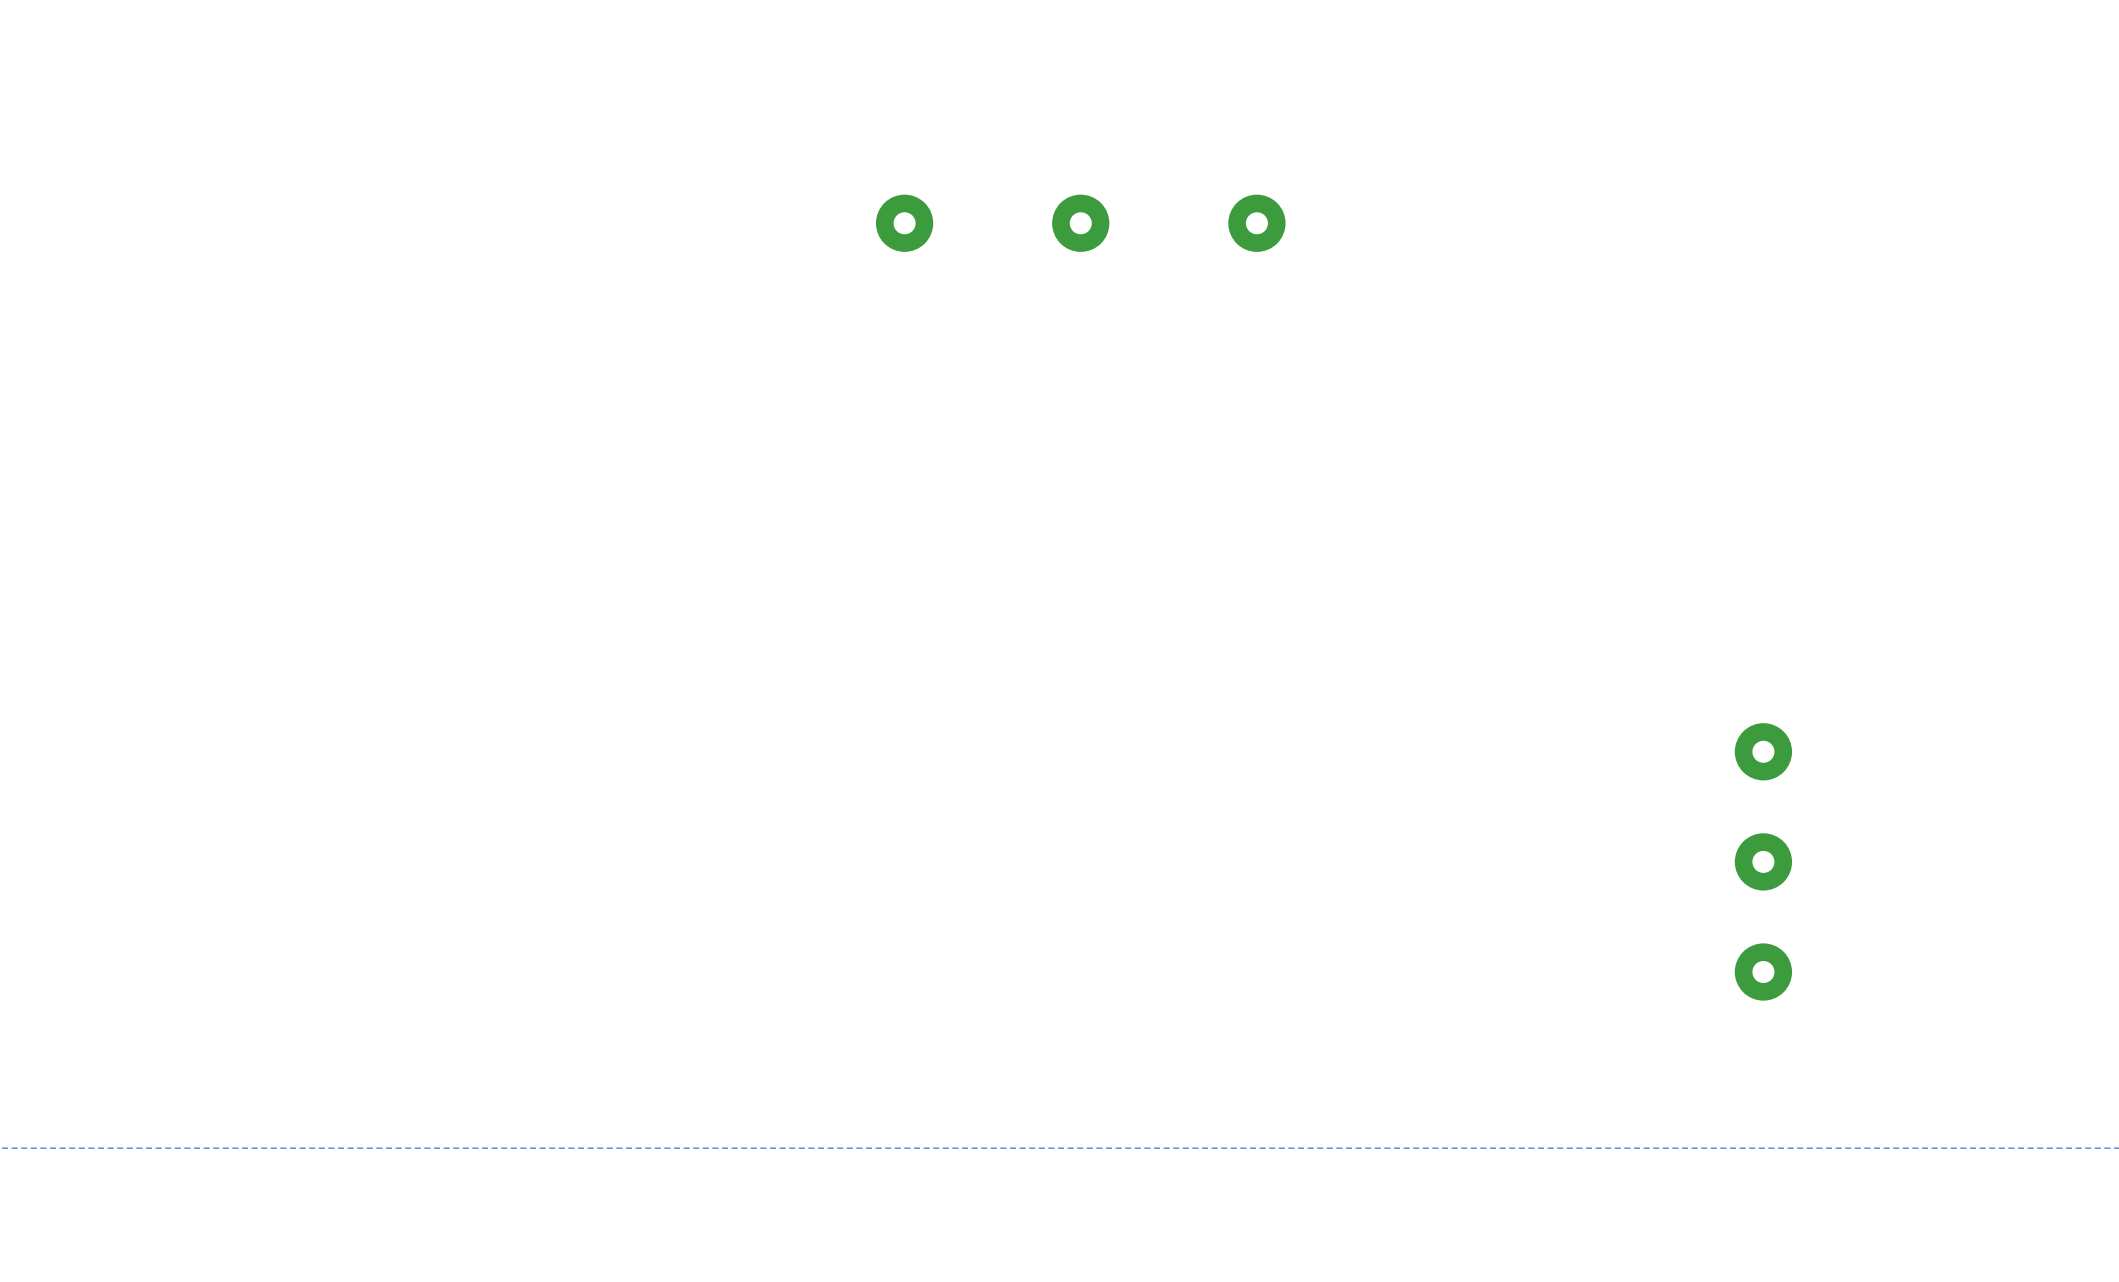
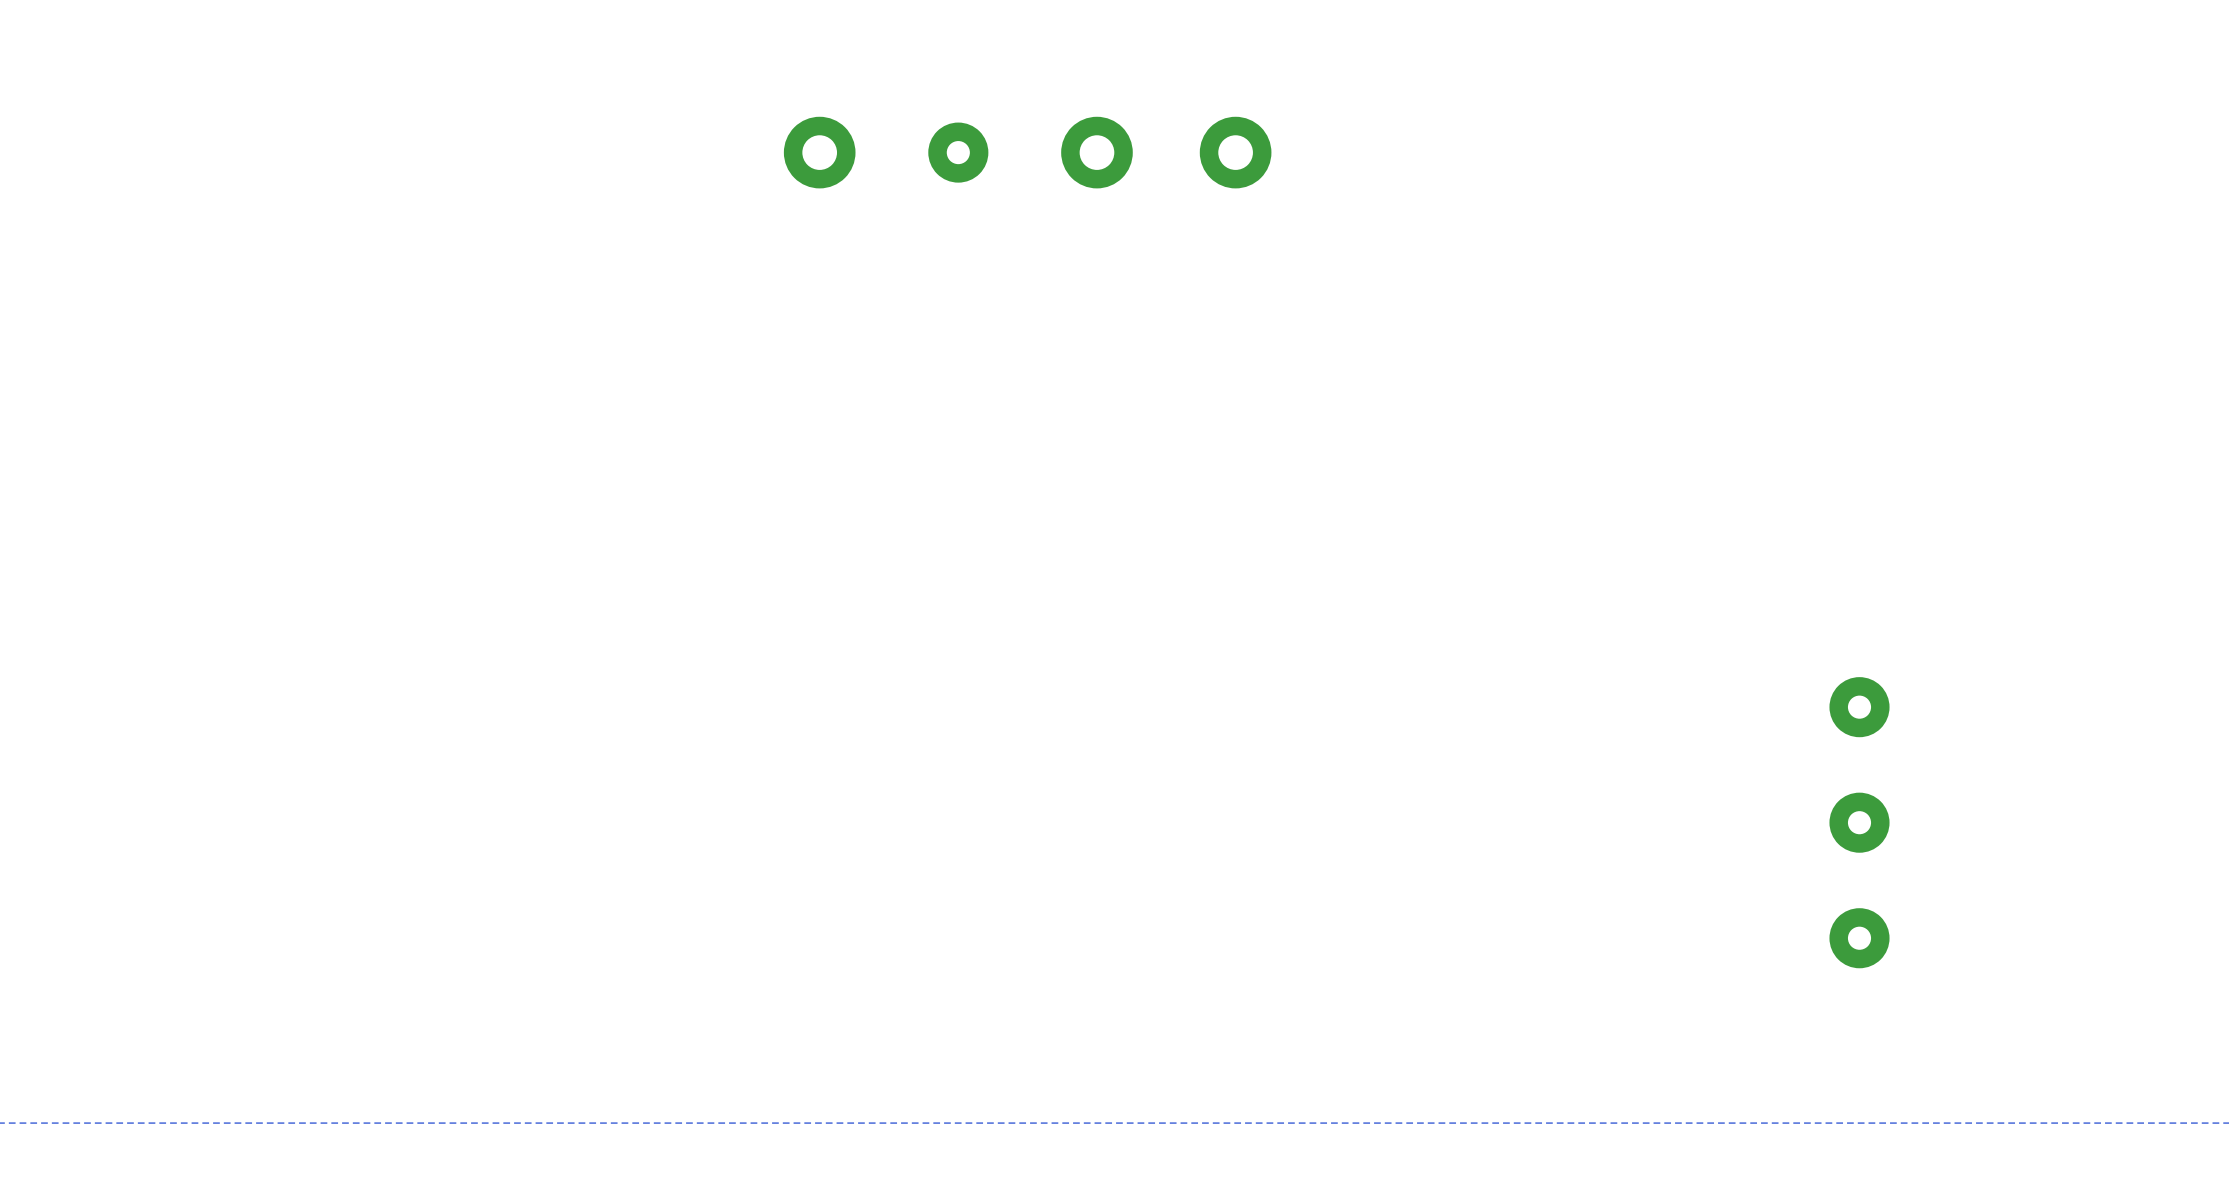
via: none -> (819, 152)
via position: (1080, 223) -> (1096, 152)
via: none -> (1235, 152)
via: (1256, 223) -> none

